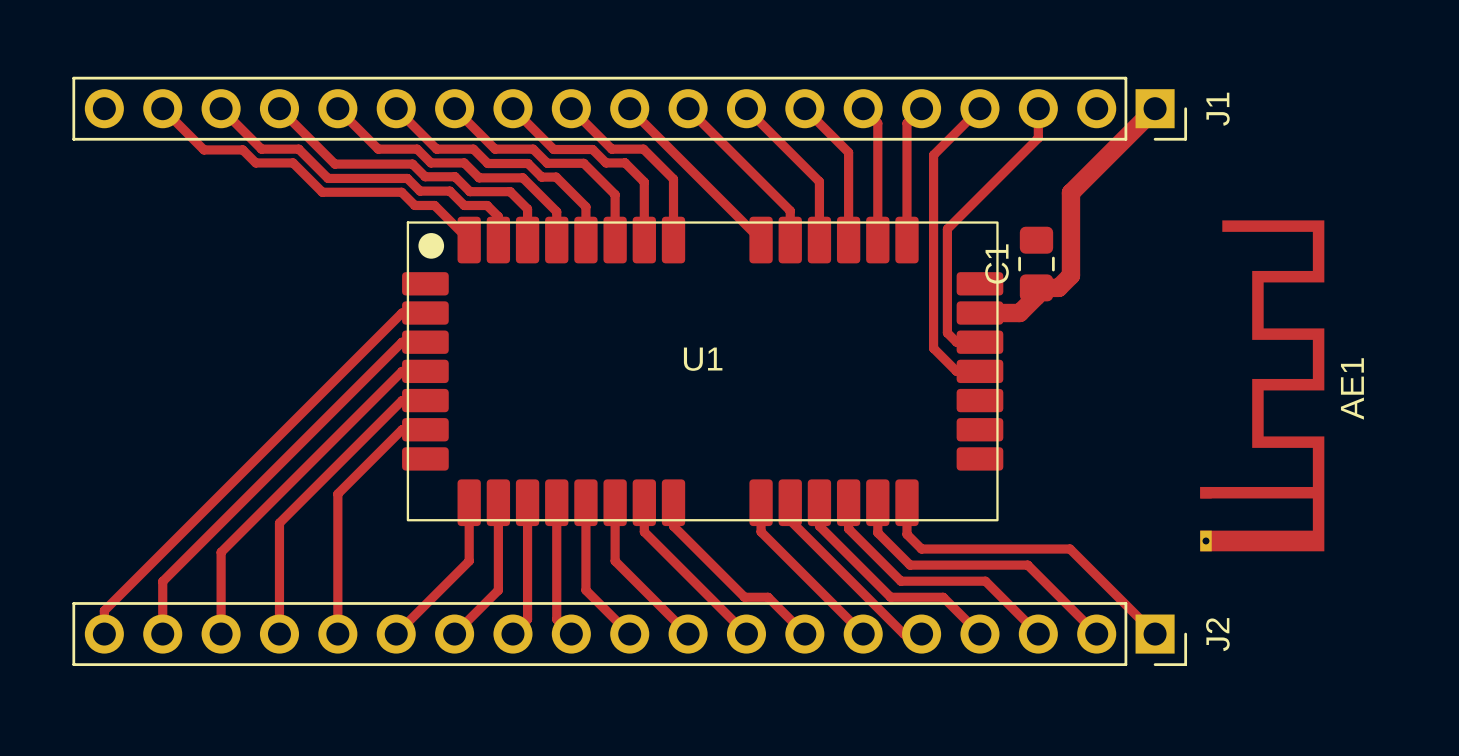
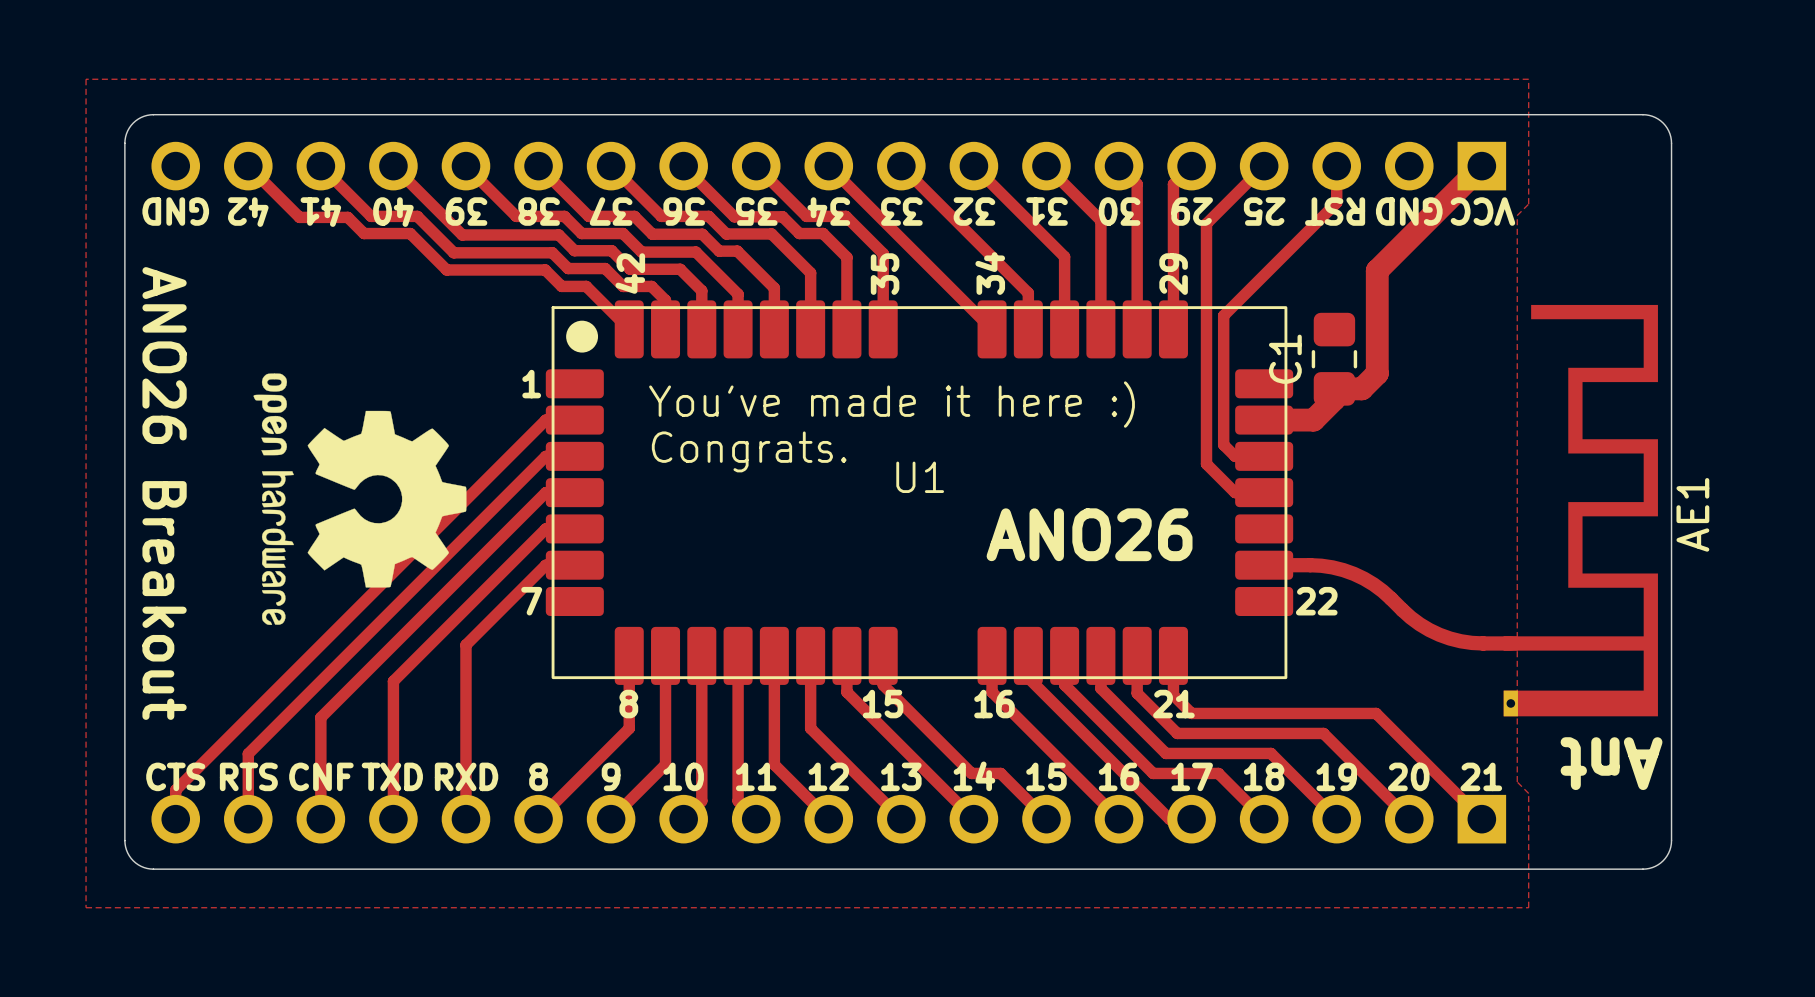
zone outline: none -> (86, 79) (86, 907) (1528, 907) (1528, 793) (1517, 782) (1517, 215) (1528, 204) (1528, 79) (86, 79)
board edge: none -> (153, 114) (1642, 114) (1655, 117) (1667, 128) (1671, 143) (1671, 840) (1668, 852) (1658, 864) (1642, 869) (153, 869) (141, 866) (129, 855) (124, 840) (124, 143) (126, 133) (133, 123) (141, 117) (153, 114)
J1 side: top (629, 108) -> bottom (828, 166)
text: none -> GND (175, 211)
text: none -> 42 (248, 212)
text: none -> 41 (320, 212)
text: none -> 40 (393, 212)
text: none -> 39 (466, 211)
text: none -> 38 (539, 211)
text: none -> 37 (611, 211)
text: none -> 36 (684, 211)
text: none -> 35 (756, 211)
text: none -> 34 (828, 212)
text: none -> 33 (901, 211)
text: none -> 32 (974, 211)
text: none -> 31 (1047, 211)
text: none -> 30 (1119, 211)
text: none -> 29 (1192, 211)
text: none -> 25 (1264, 211)
text: none -> RST (1335, 211)
text: none -> GND (1409, 211)
text: none -> VCC (1482, 211)
text: none -> 34 (990, 273)
text: none -> 42 (630, 273)
text: none -> 35 (885, 274)
text: none -> 29 (1173, 274)
drawing: none -> [253, 373, 467, 625]
text: none -> 1 (531, 384)
text: none -> You've made it here :) (892, 404)
text: none -> Congrats. (749, 451)
text: none -> ANO26 Breakout (164, 493)
AE1 position: (1262, 385) -> (1580, 510)
text: none -> ANO26 (1089, 534)
track: none -> (1264, 565) (1321, 565) (1343, 570) (1373, 584) (1410, 617) (1439, 634) (1471, 642) (1510, 643)
text: none -> 7 (531, 601)
text: none -> 22 (1316, 601)
text: none -> 8 (628, 704)
text: none -> 15 (883, 704)
text: none -> 16 (994, 704)
text: none -> 21 (1173, 704)
text: none -> Ant (1611, 763)
text: none -> 12 (828, 776)
text: none -> 21 (1481, 776)
text: none -> CTS (175, 776)
text: none -> RTS (248, 776)
text: none -> CNF (321, 776)
text: none -> TXD (392, 776)
text: none -> RXD (466, 776)
text: none -> 8 (538, 776)
text: none -> 9 (611, 776)
text: none -> 10 (683, 776)
text: none -> 11 (756, 776)
text: none -> 13 (901, 776)
text: none -> 14 (974, 776)
text: none -> 15 (1046, 776)
text: none -> 16 (1119, 776)
text: none -> 17 (1192, 776)
text: none -> 18 (1264, 776)
text: none -> 19 (1336, 776)
text: none -> 20 (1408, 776)
J2 side: top (629, 634) -> bottom (828, 819)

